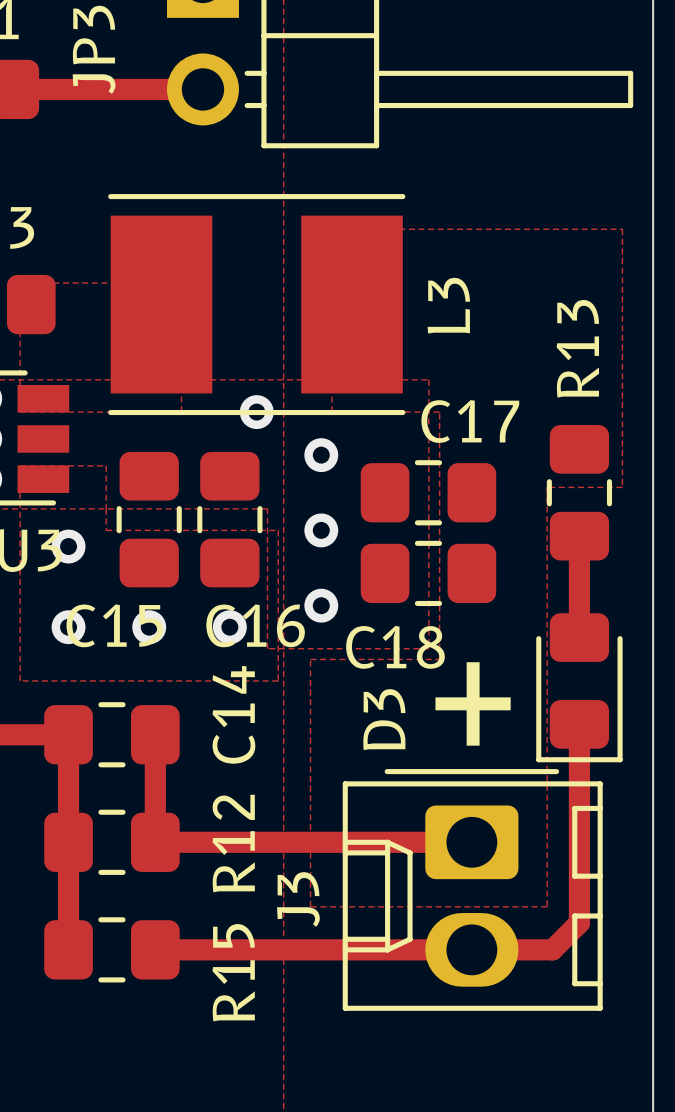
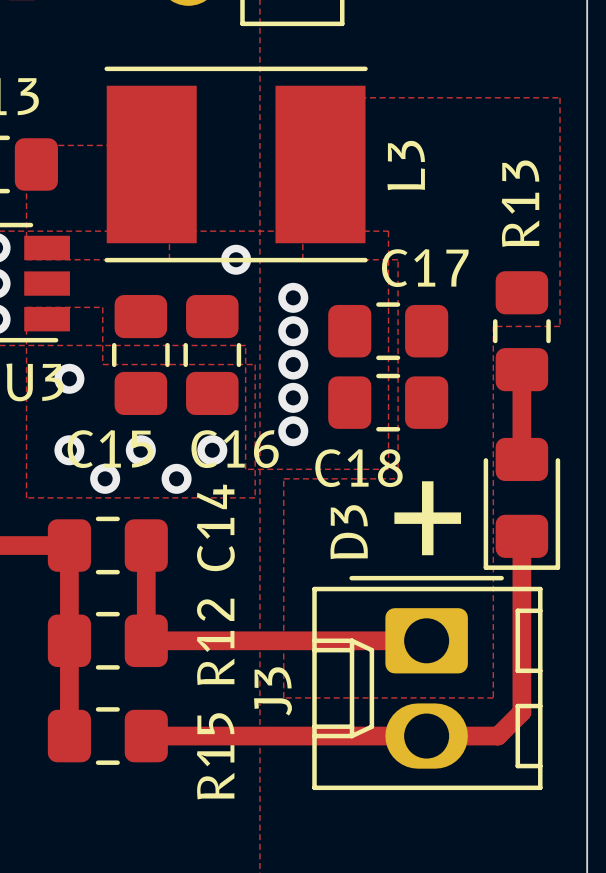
via: none -> (293, 331)
via: none -> (293, 397)
via: none -> (105, 478)
via: none -> (176, 478)

